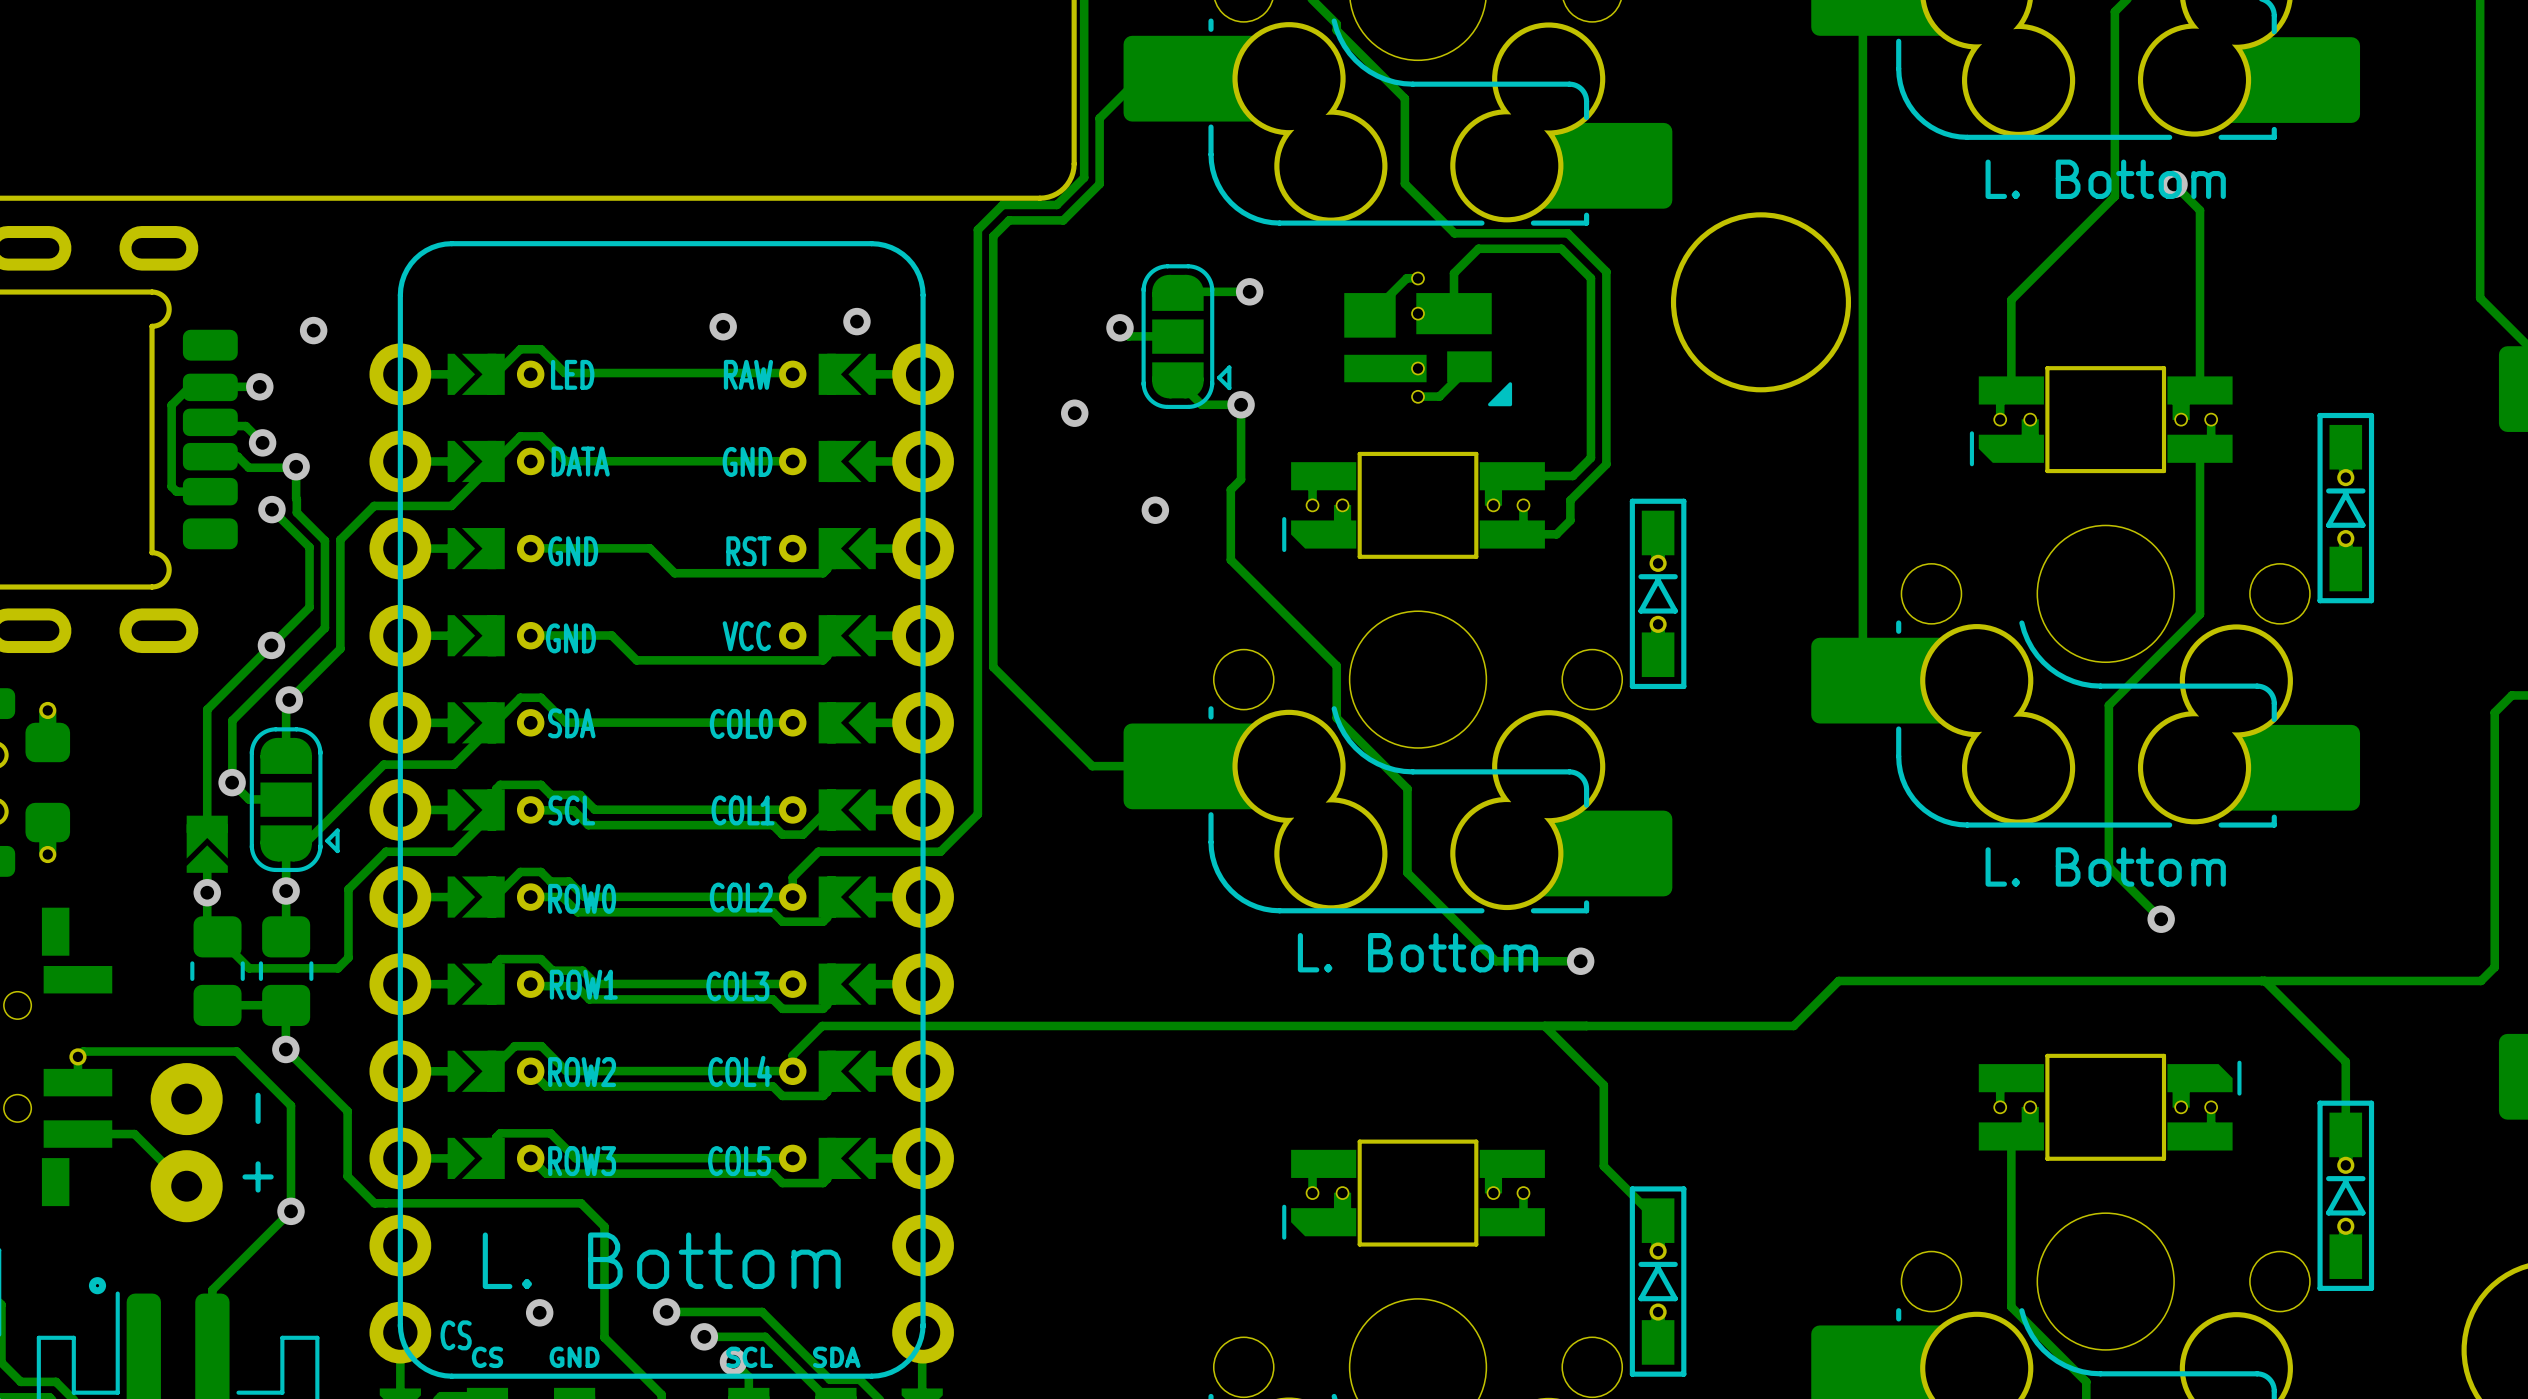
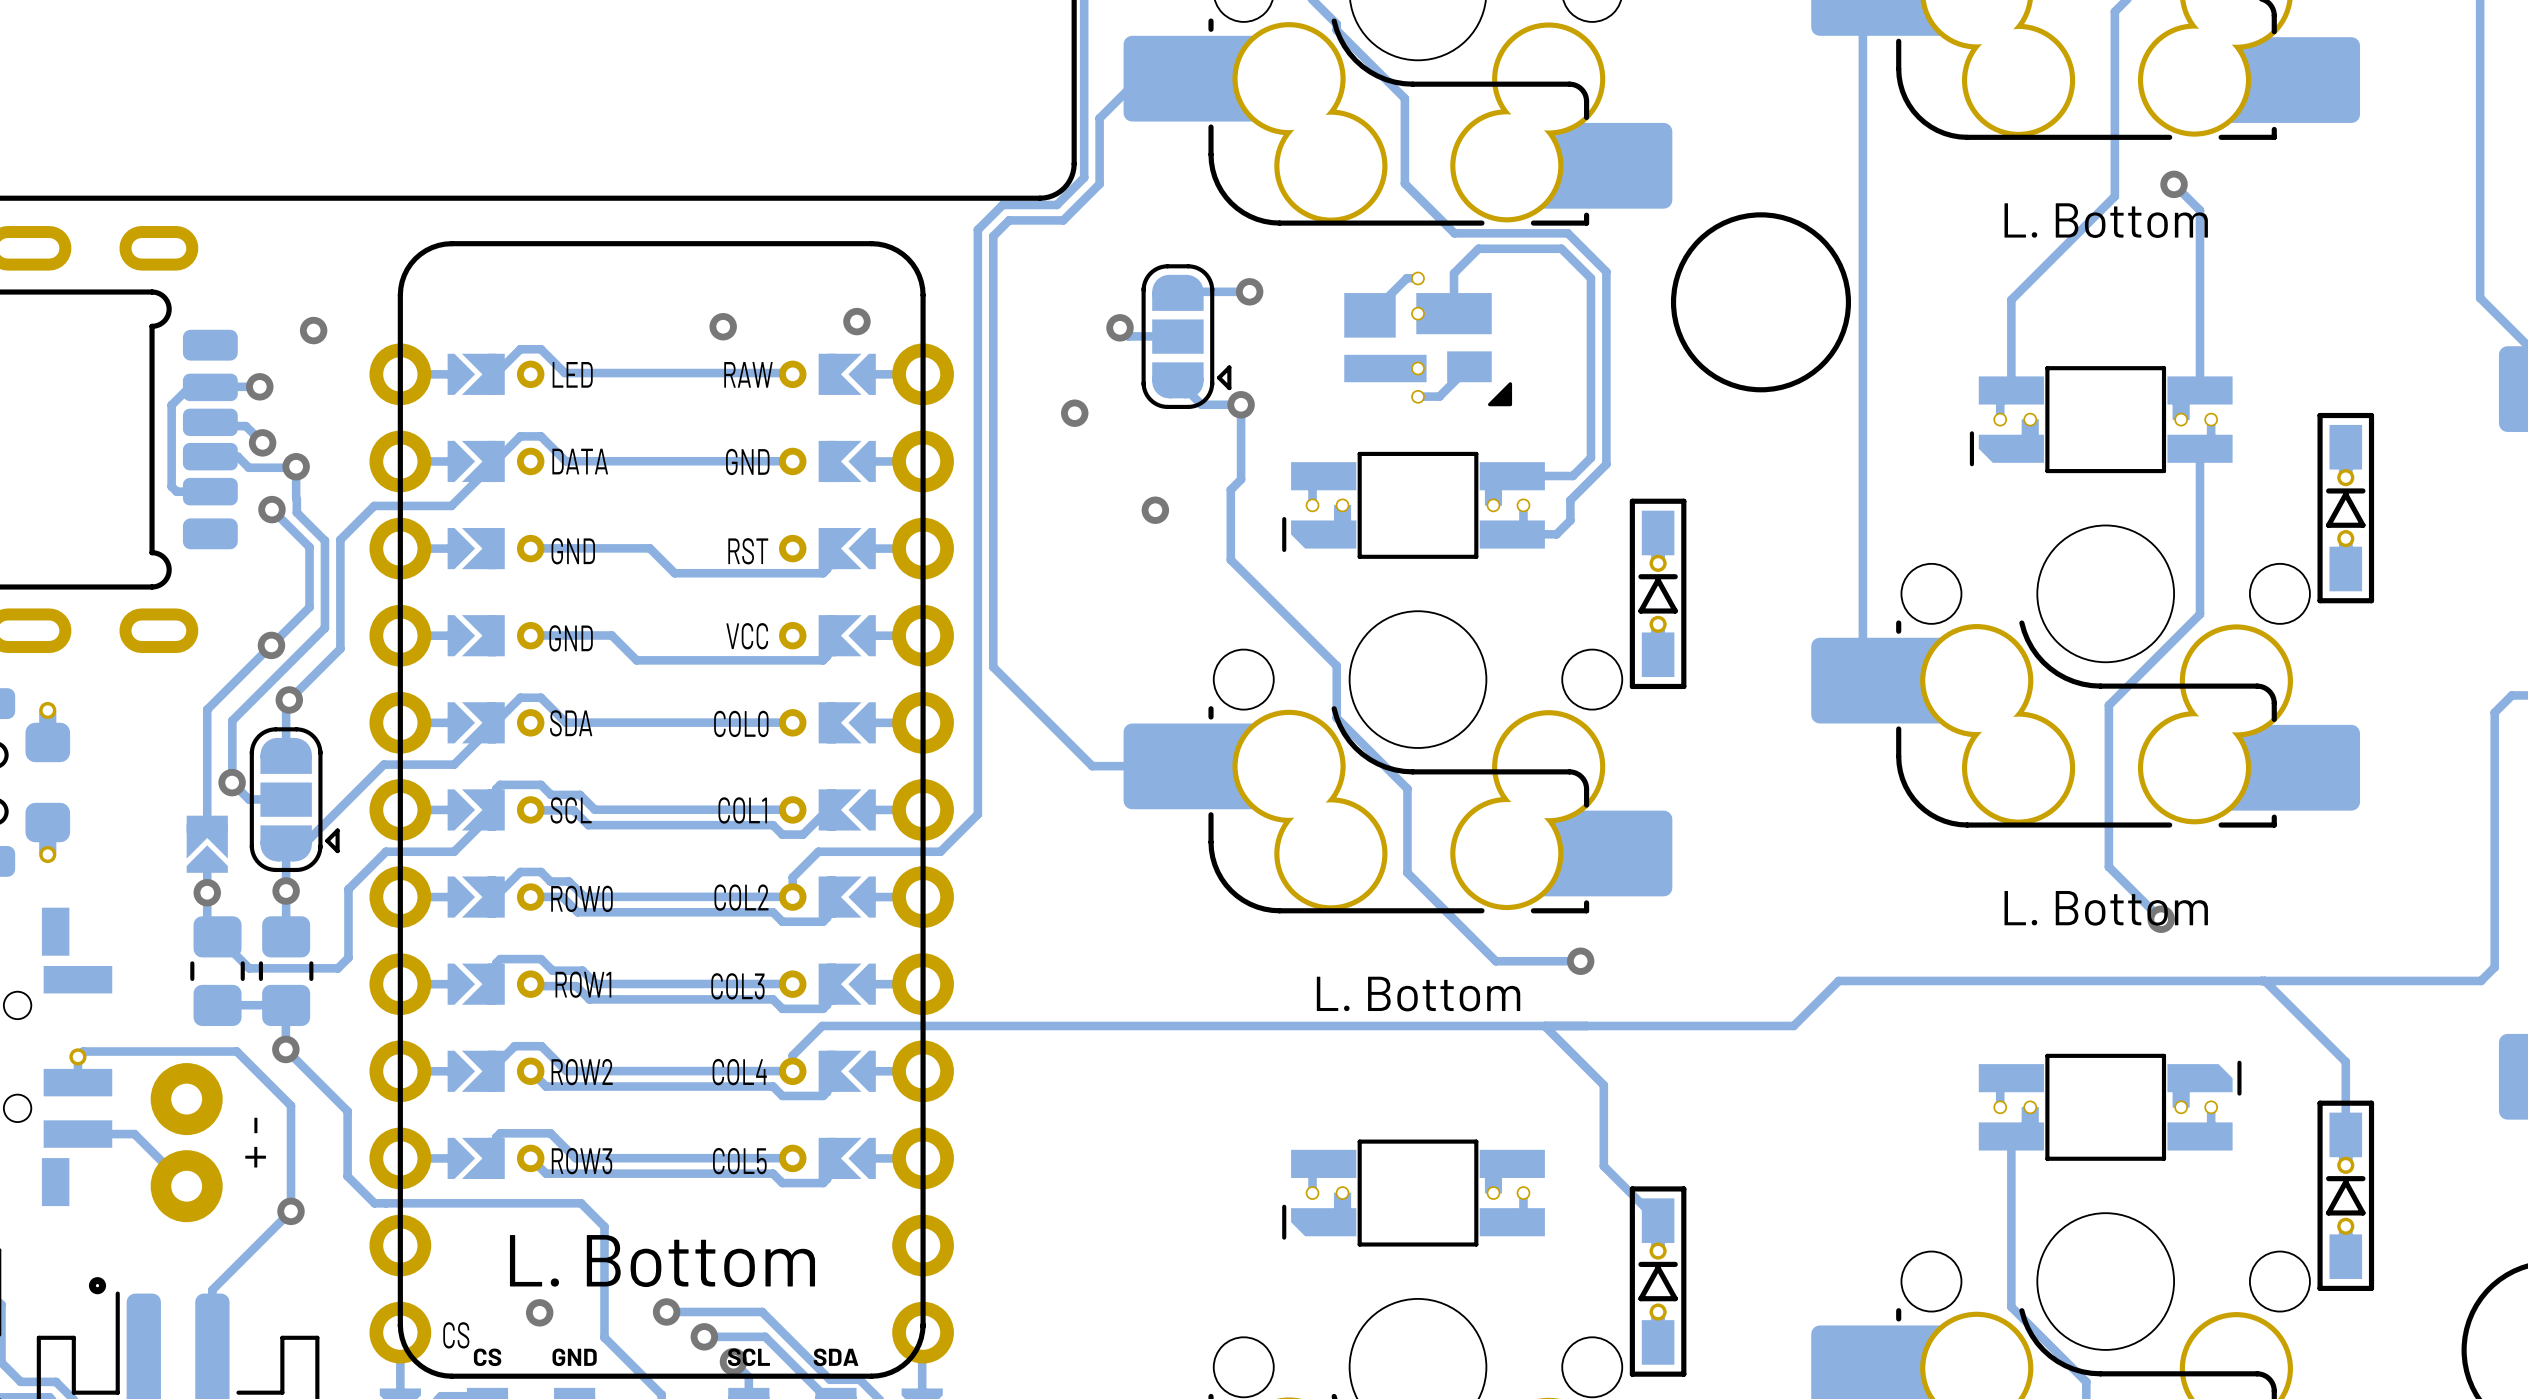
text position: L. Bottom (2105, 179) -> L. Bottom (2106, 220)
text position: L. Bottom (2105, 866) -> L. Bottom (2106, 908)
text position: L. Bottom (1418, 952) -> L. Bottom (1418, 994)

